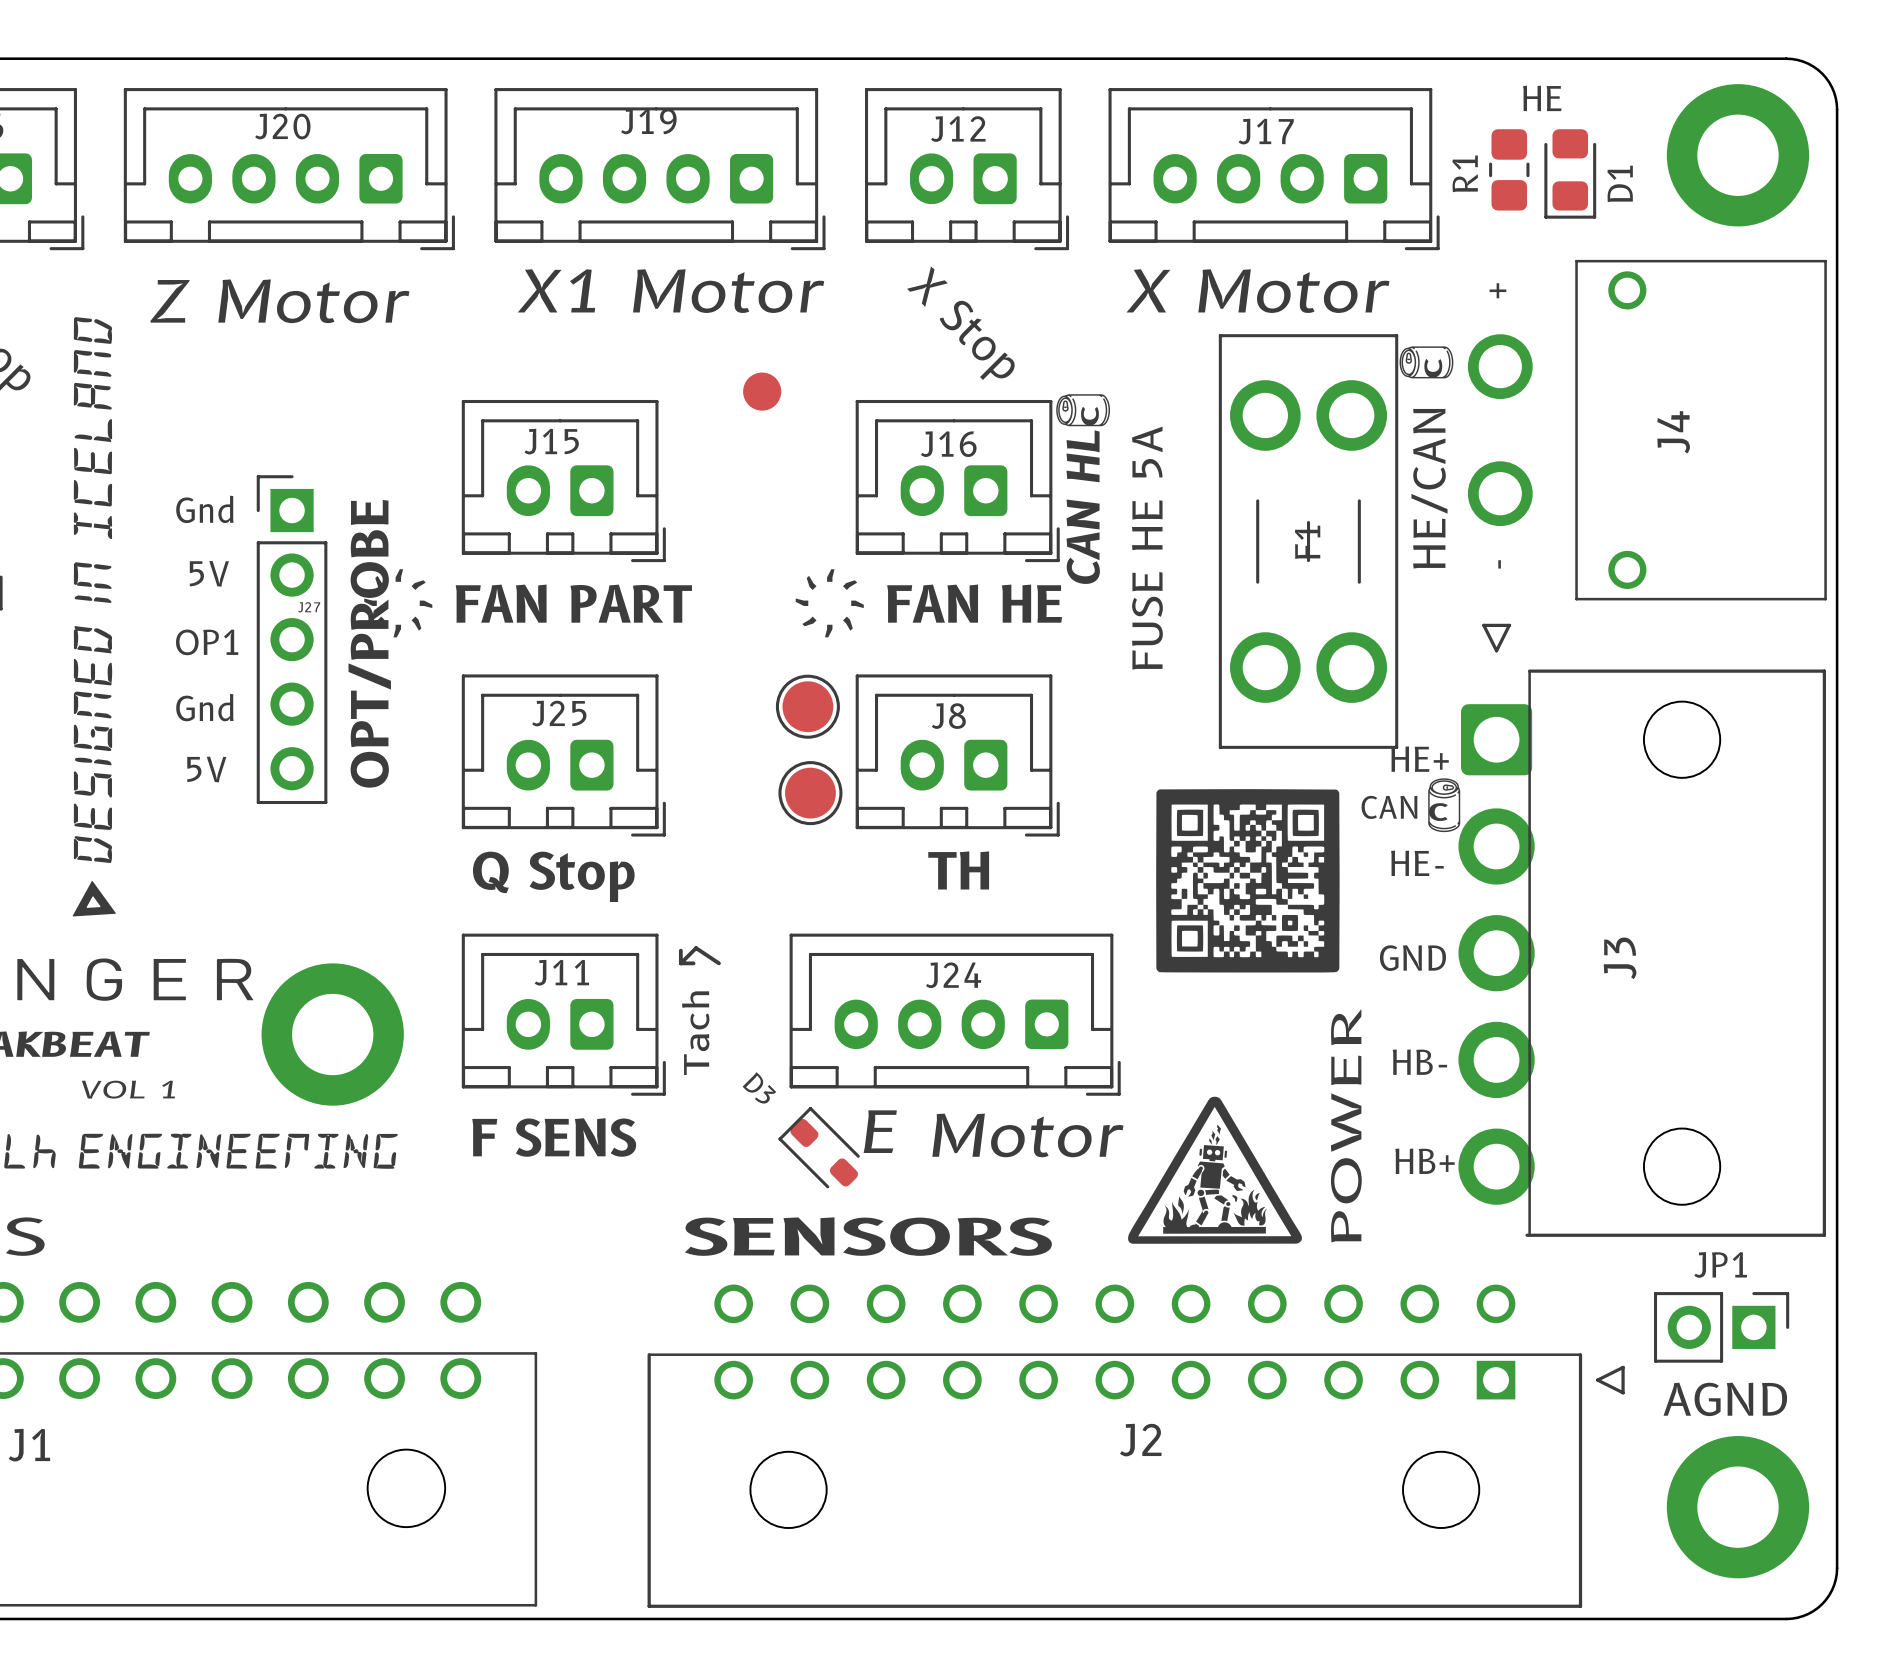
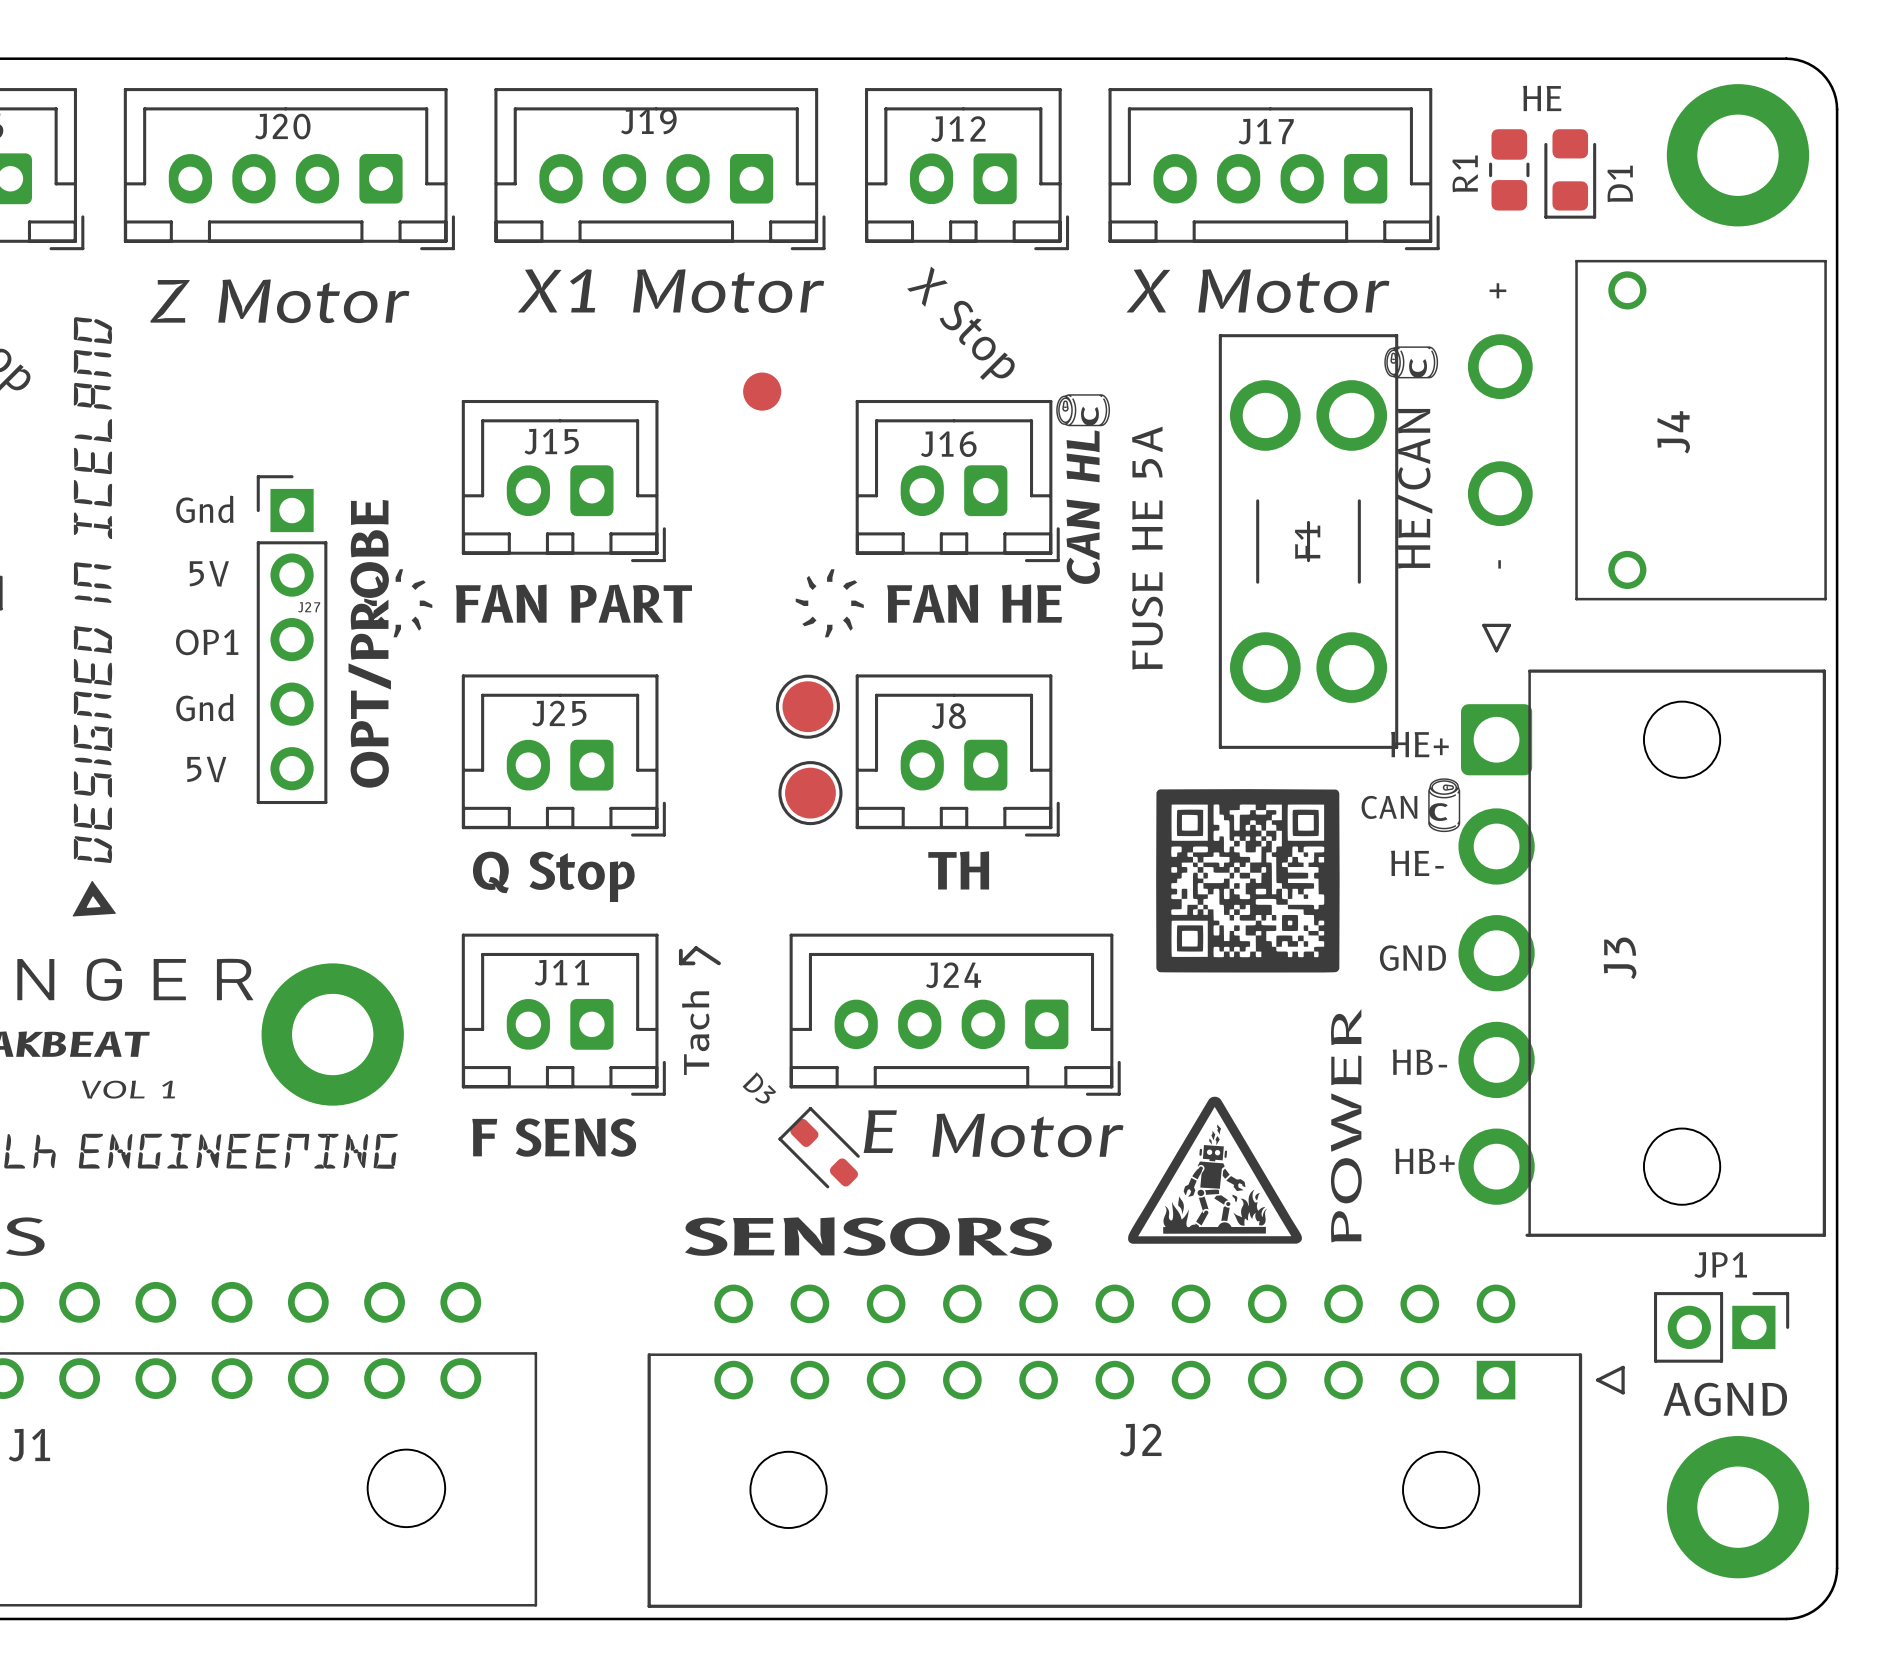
drawing position: (1408, 358) -> (1393, 358)
drawing position: (1408, 359) -> (1393, 359)
drawing position: (1426, 362) -> (1411, 362)
text position: C (1433, 368) -> C (1418, 368)
text position: HE/CAN (1429, 488) -> HE/CAN (1414, 488)
text position: HE+ (1419, 759) -> HE+ (1419, 744)

